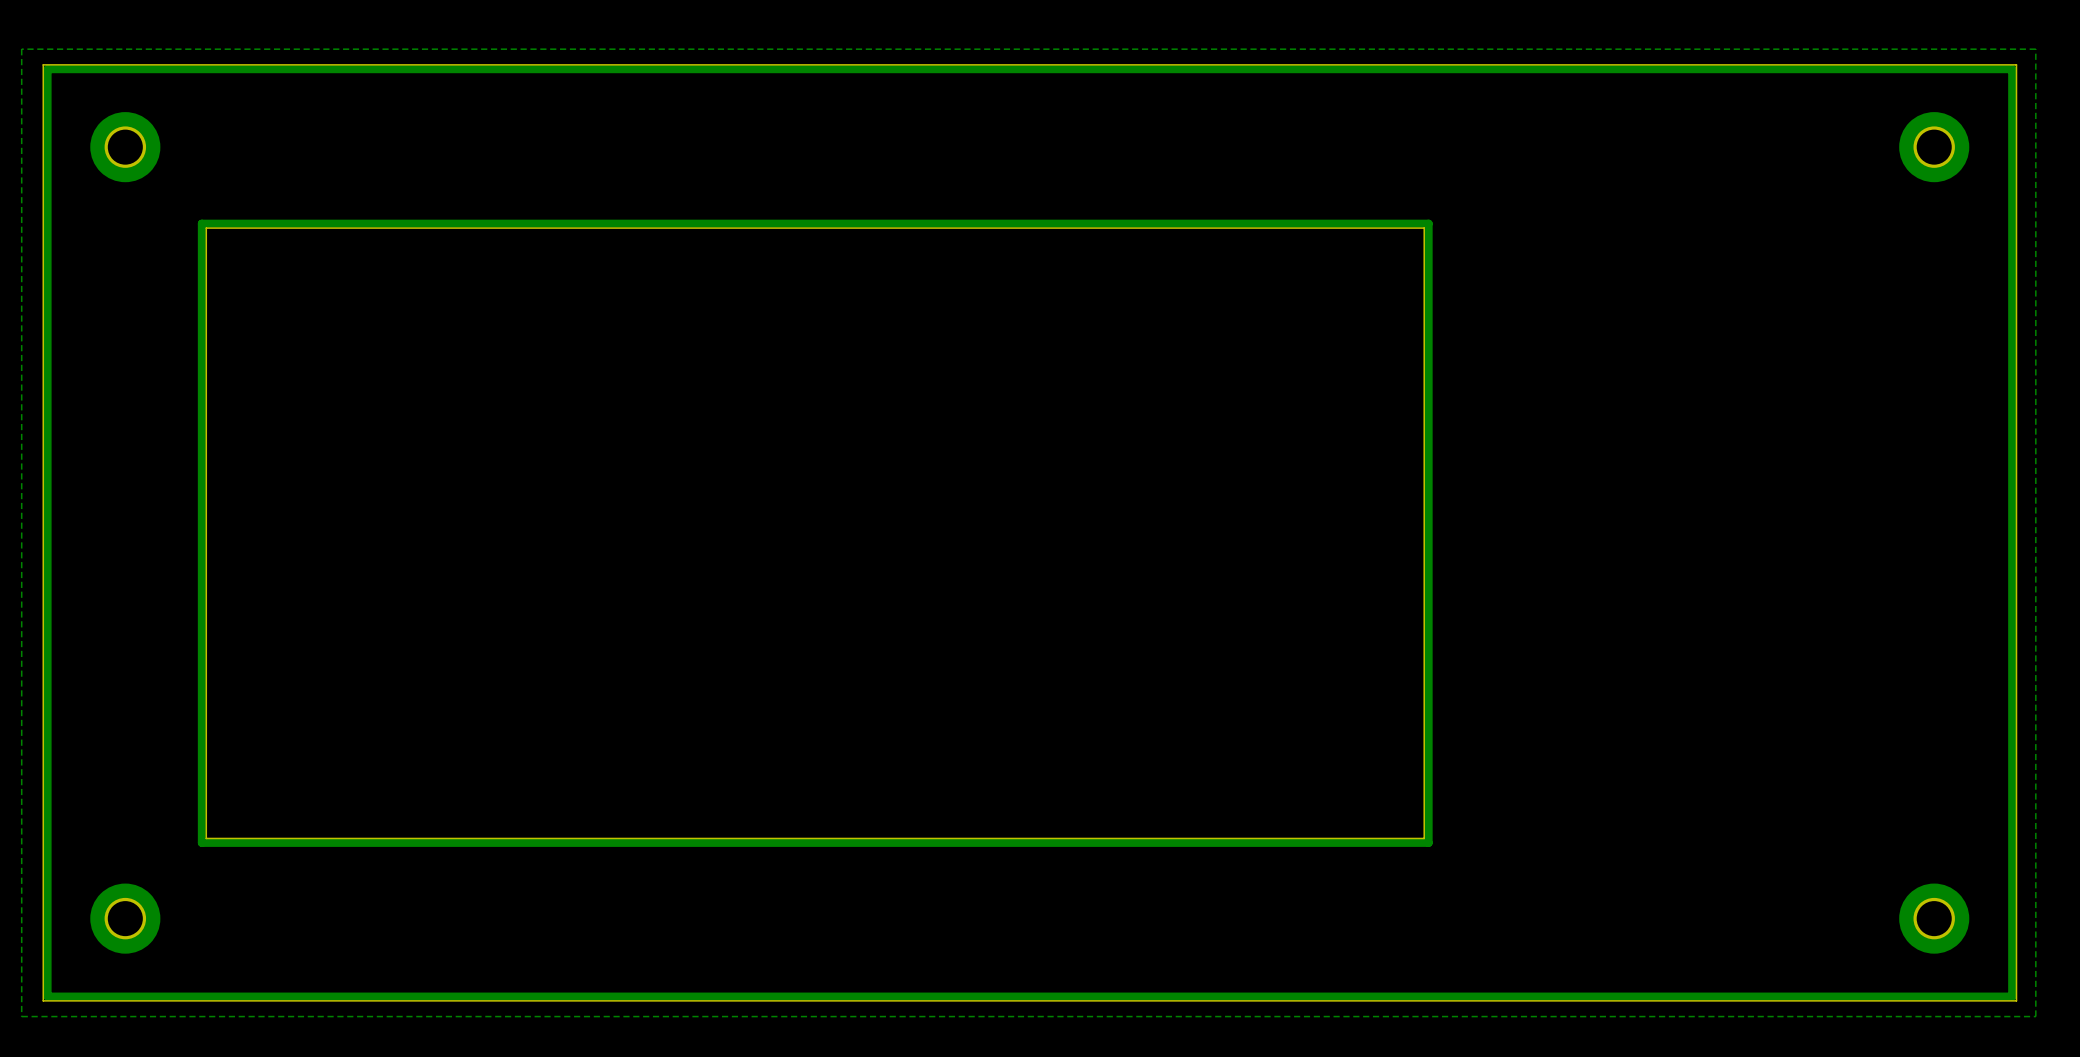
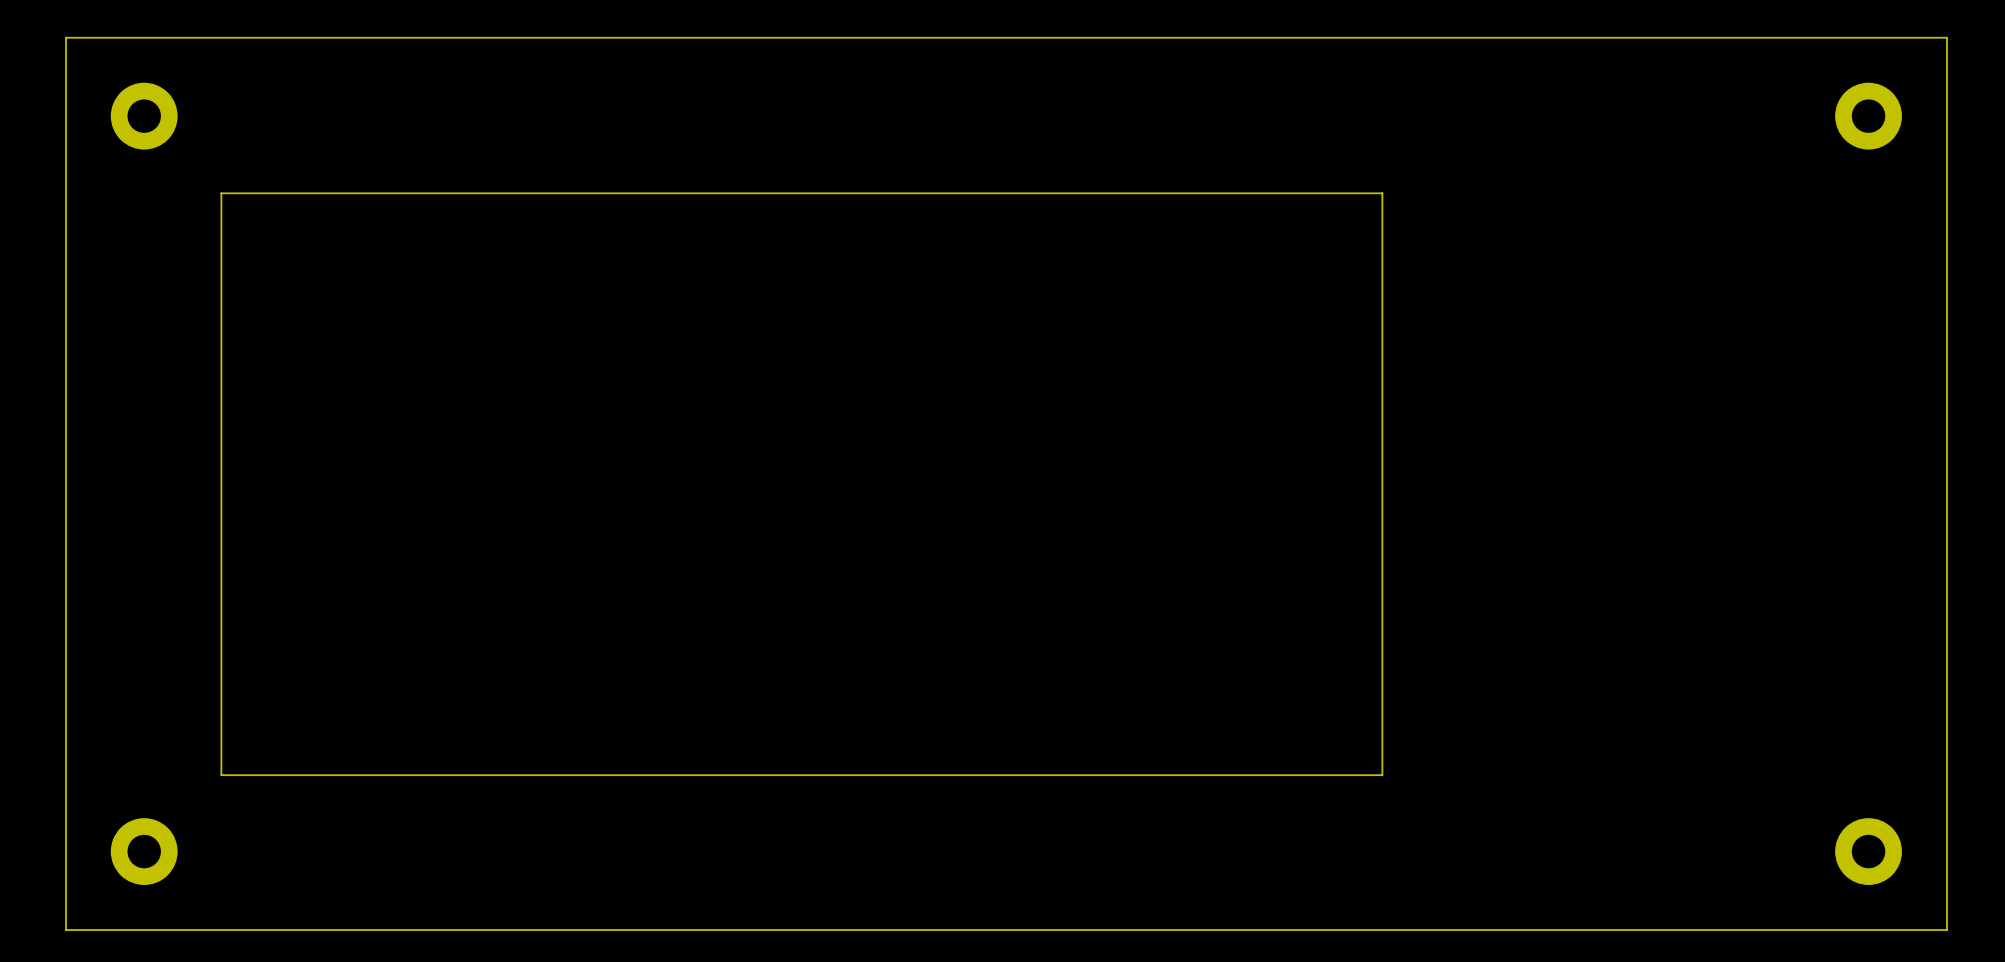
zone outline: (2035, 49) (2035, 1016) (21, 1016) (21, 49) (2035, 49) -> none
track: (2012, 69) (2012, 996) (47, 996) (47, 69) (2012, 69) -> none
part footprint: [90, 112, 161, 183] -> [110, 82, 178, 150]
part footprint: [1899, 112, 1970, 183] -> [1835, 82, 1902, 150]
track: (1428, 223) (1428, 842) (201, 842) (201, 223) (1428, 223) -> none
part footprint: [90, 883, 161, 954] -> [110, 818, 178, 885]
part footprint: [1899, 883, 1970, 954] -> [1835, 818, 1902, 885]

